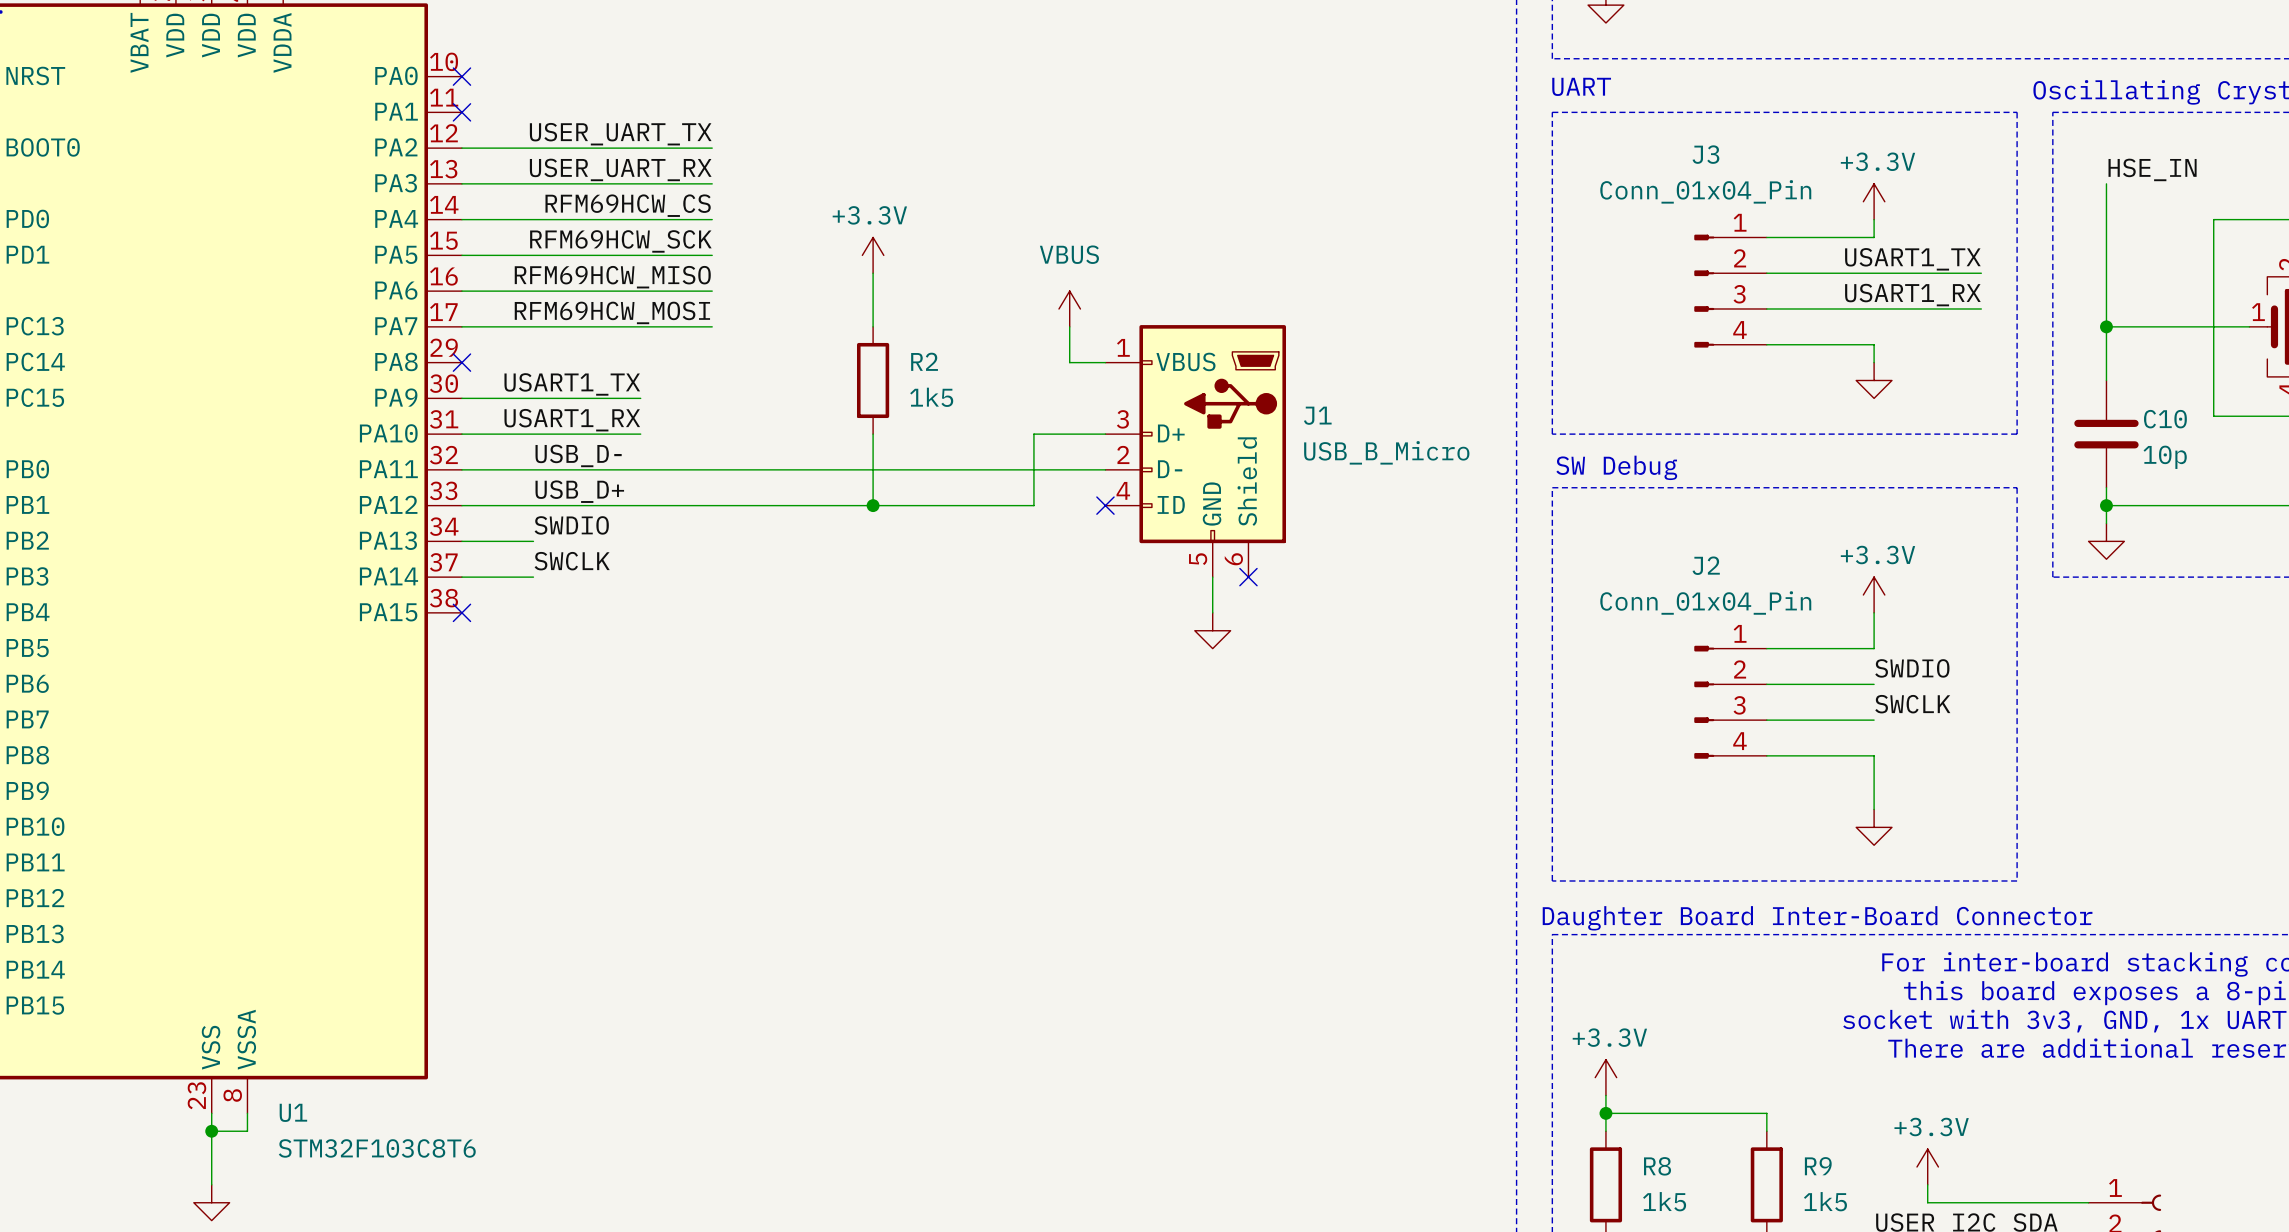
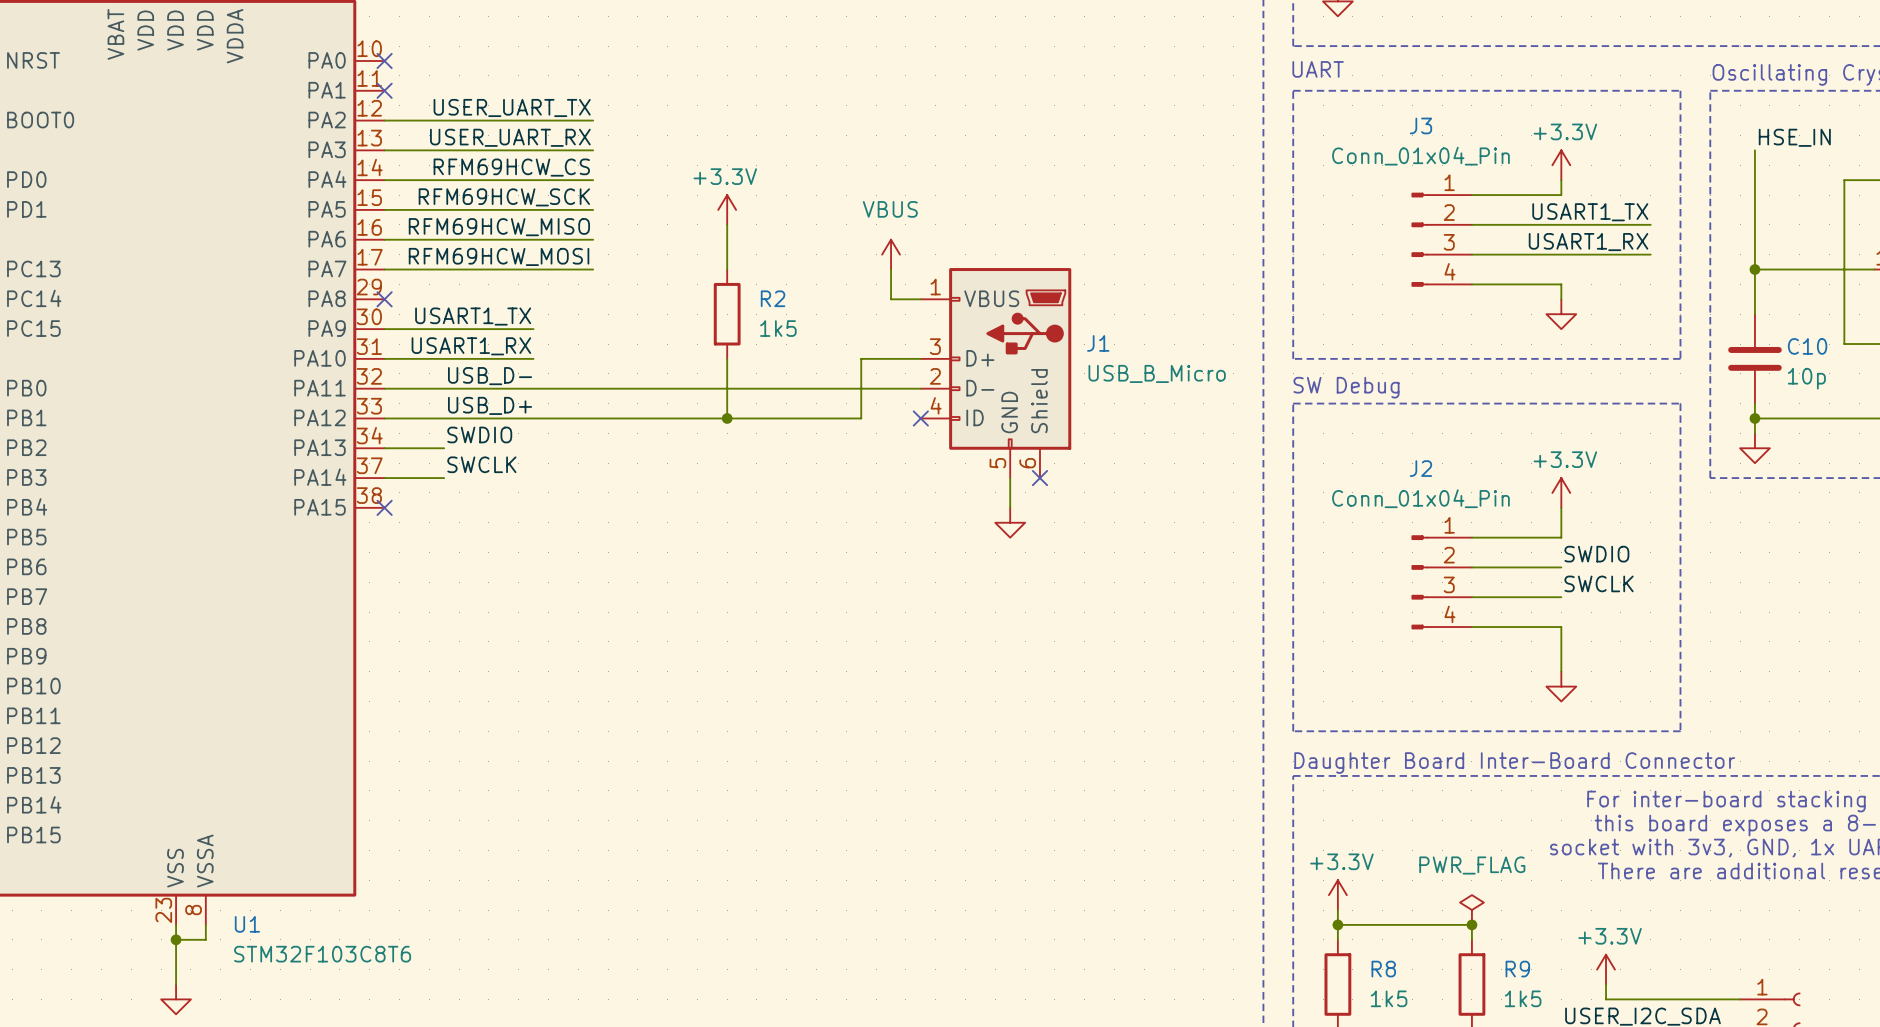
power symbol: none -> PWR_FLAG (1471, 910)
junction: none -> (1471, 924)

